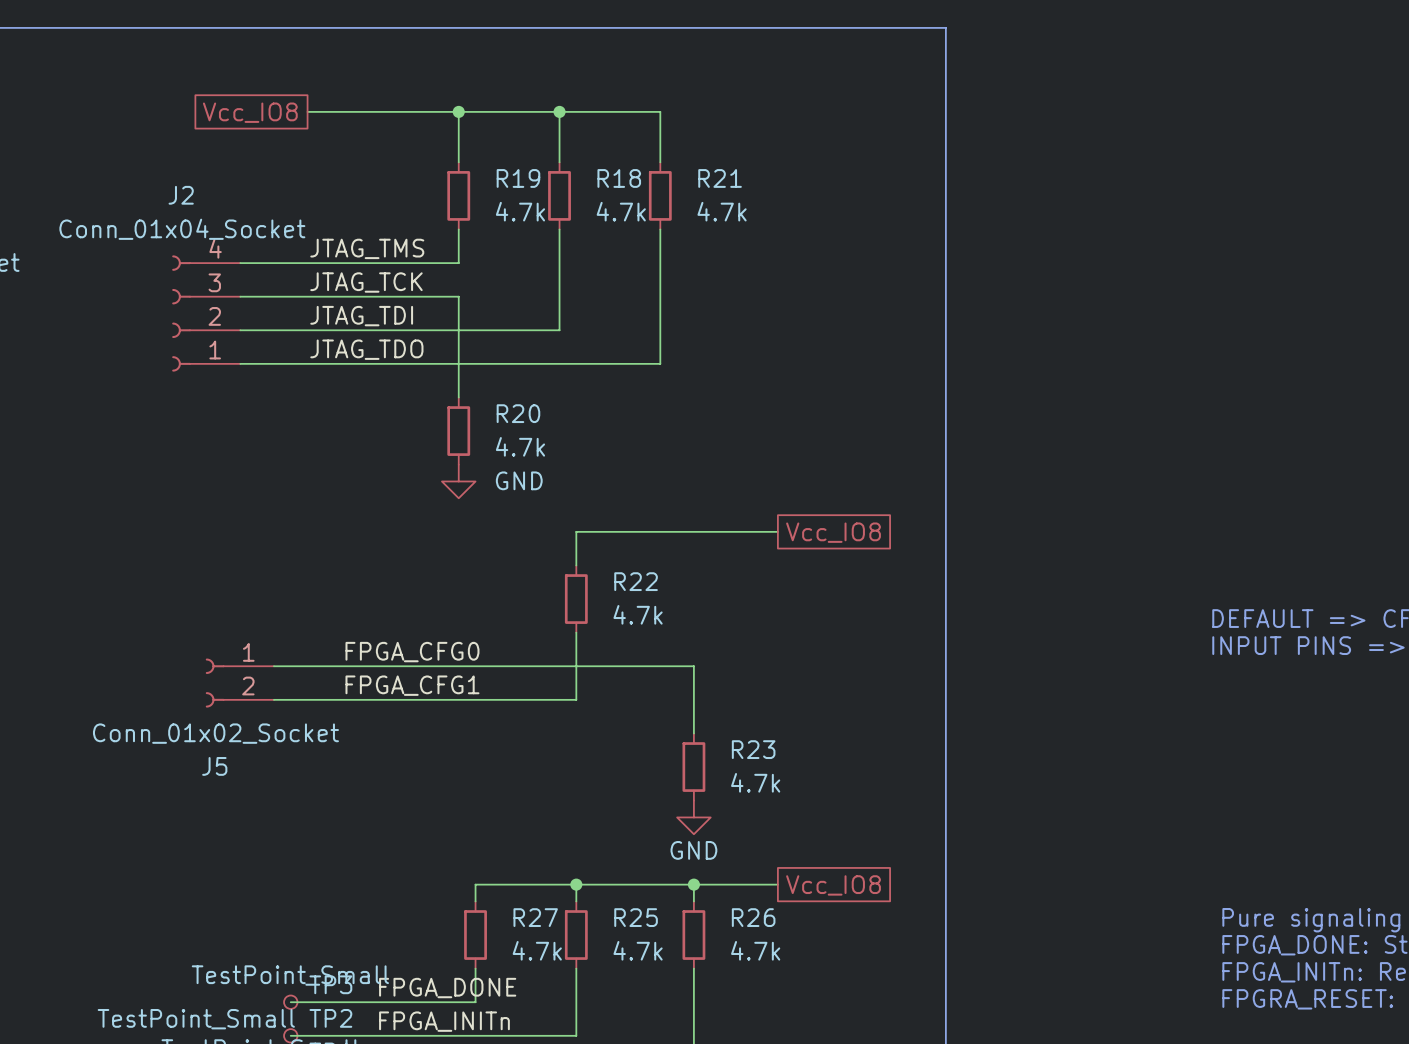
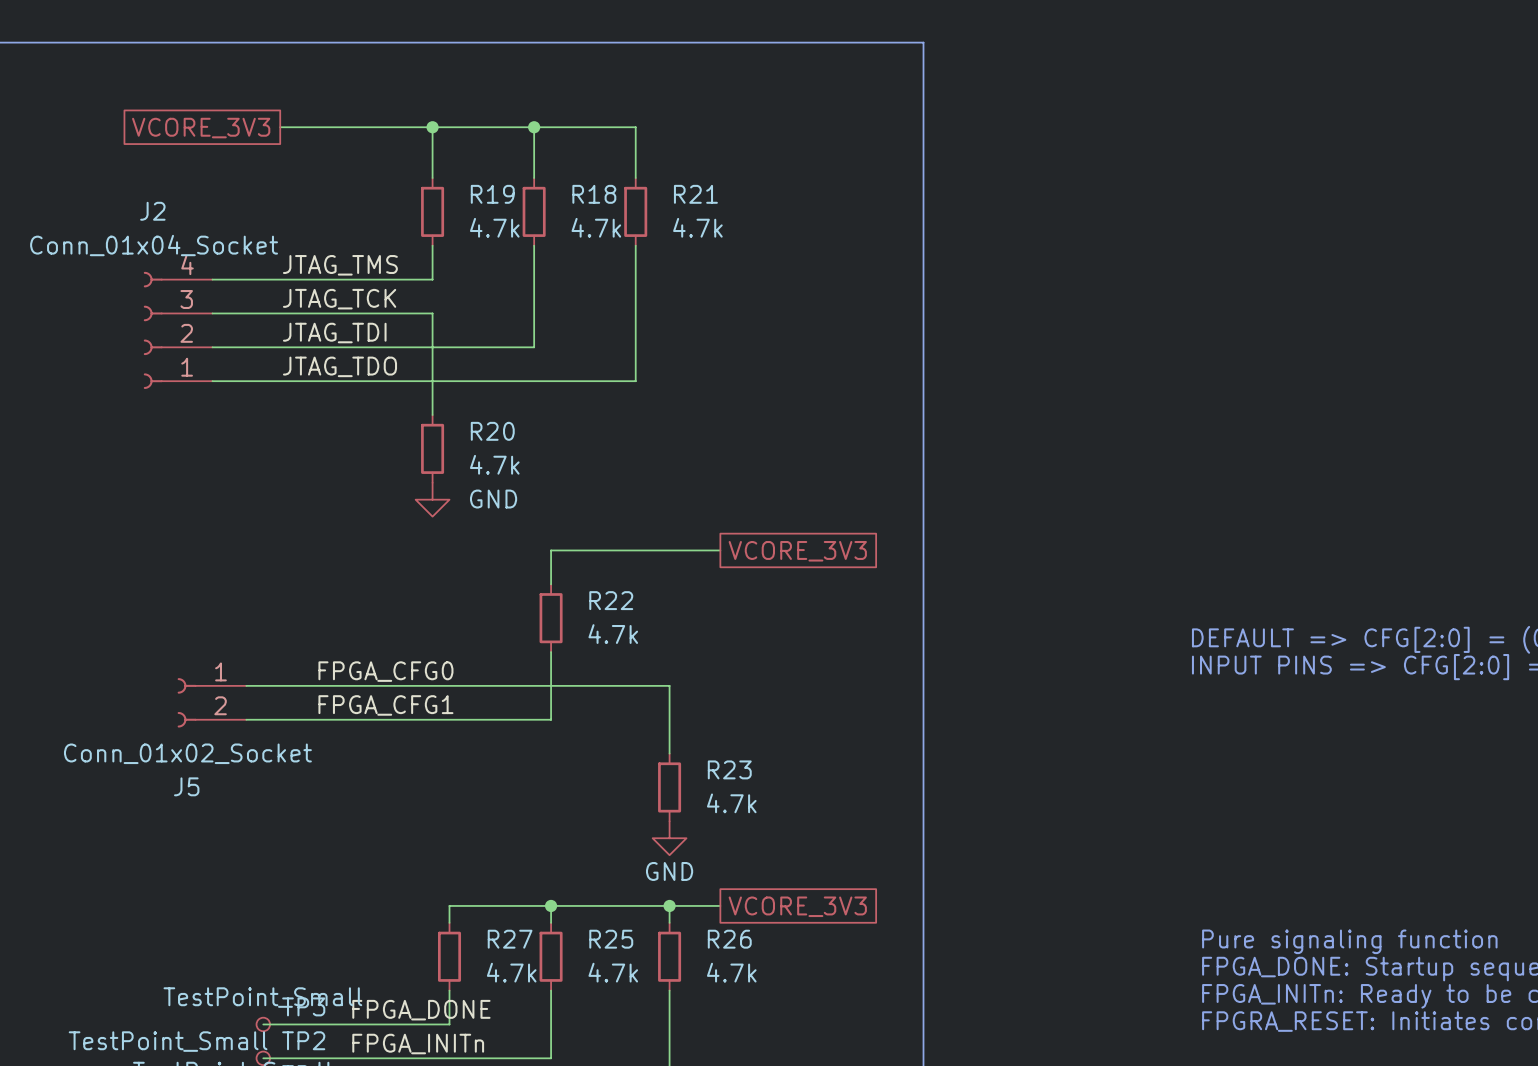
global label: Vcc_IO8 (250, 112) -> VCORE_3V3 (201, 128)
wire: (744, 531) (777, 531) -> none
global label: none -> VCORE_3V3 (797, 551)
global label: Vcc_IO8 (833, 532) -> none
wire: (744, 884) (777, 884) -> none
global label: none -> VCORE_3V3 (797, 906)
global label: Vcc_IO8 (833, 885) -> none

